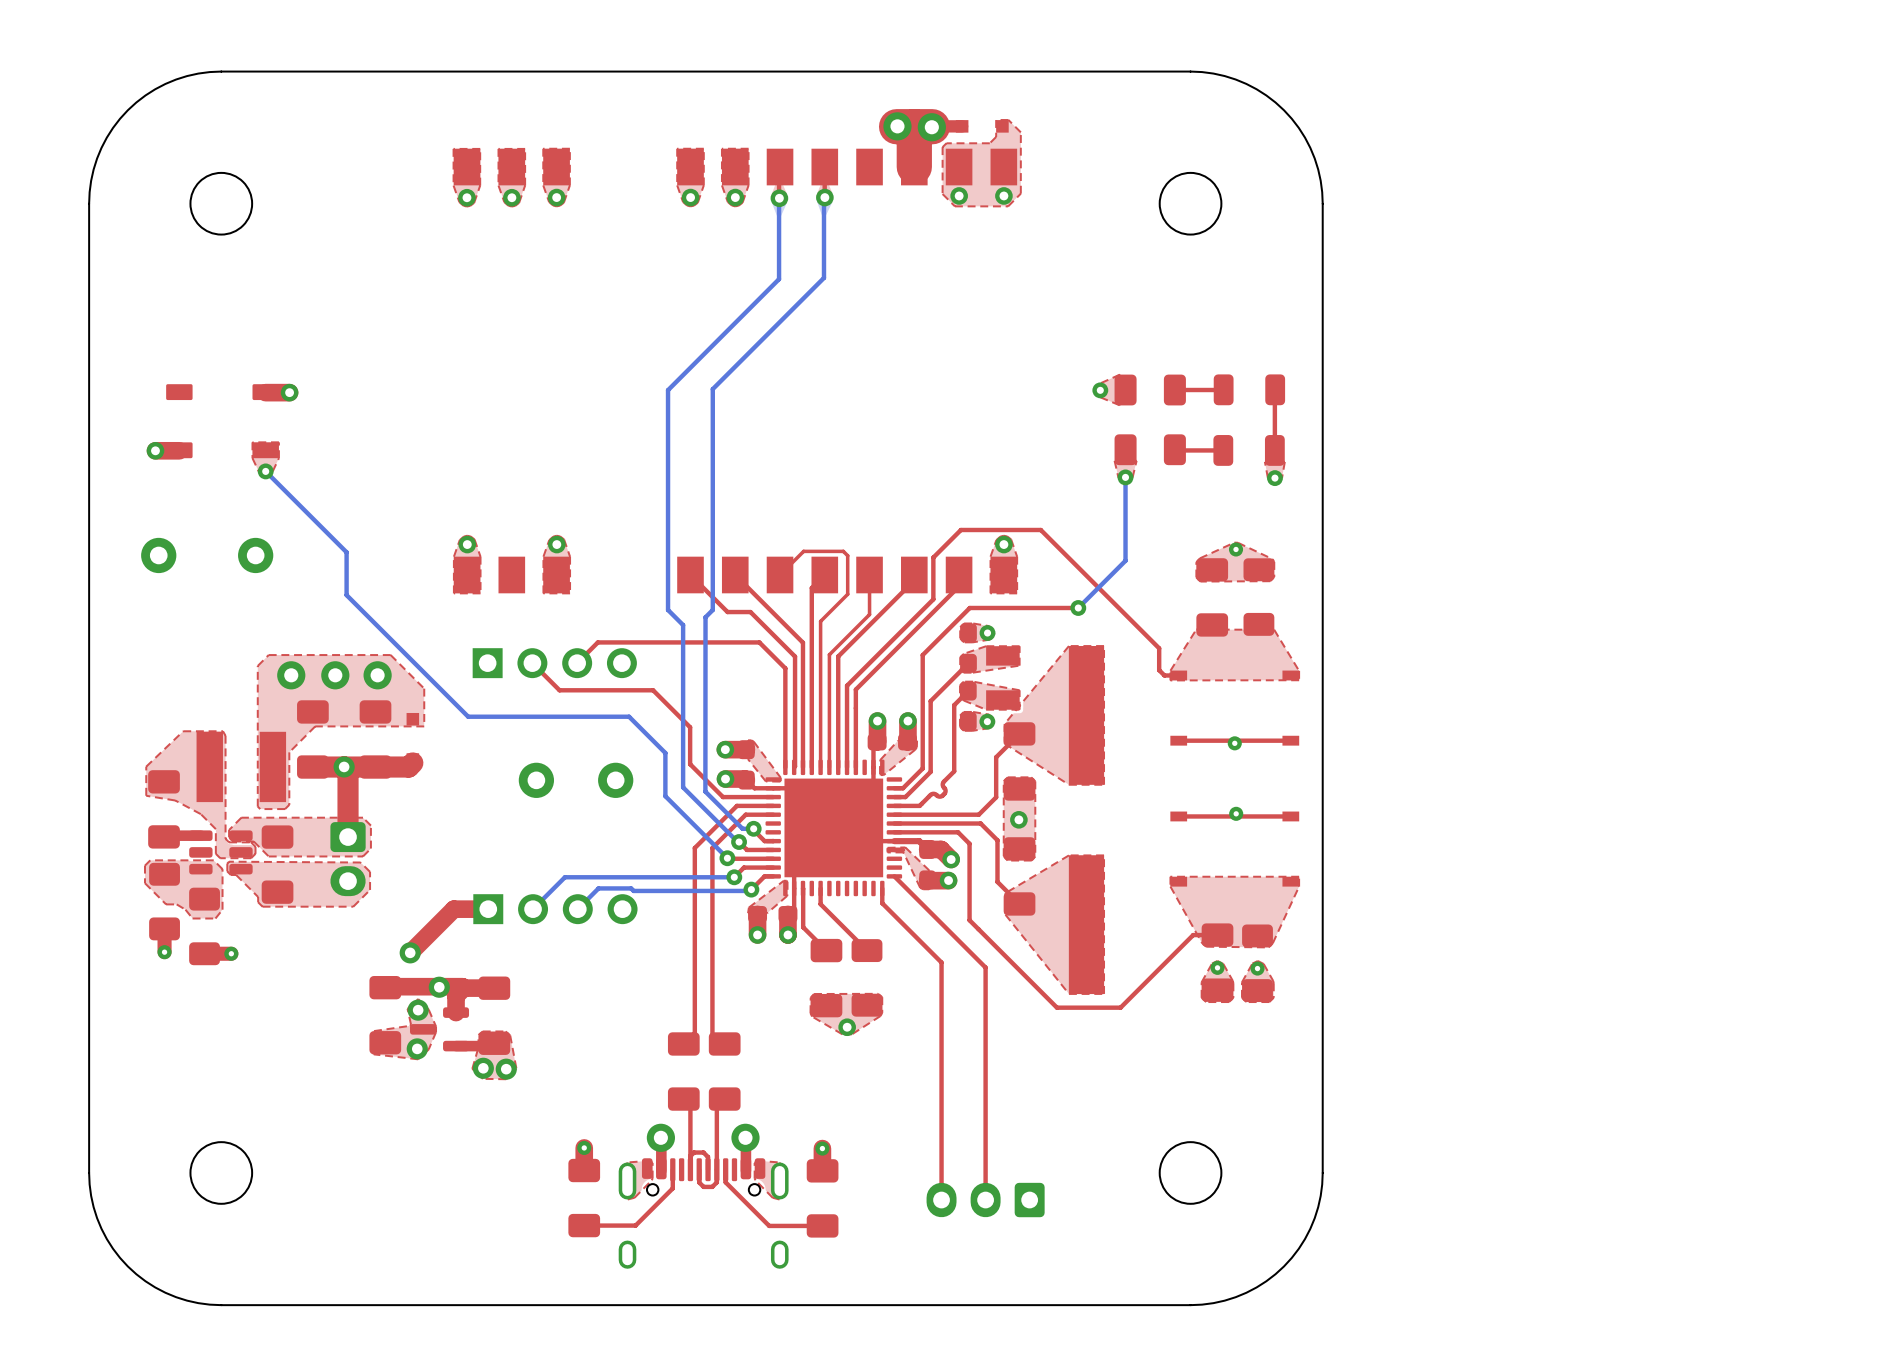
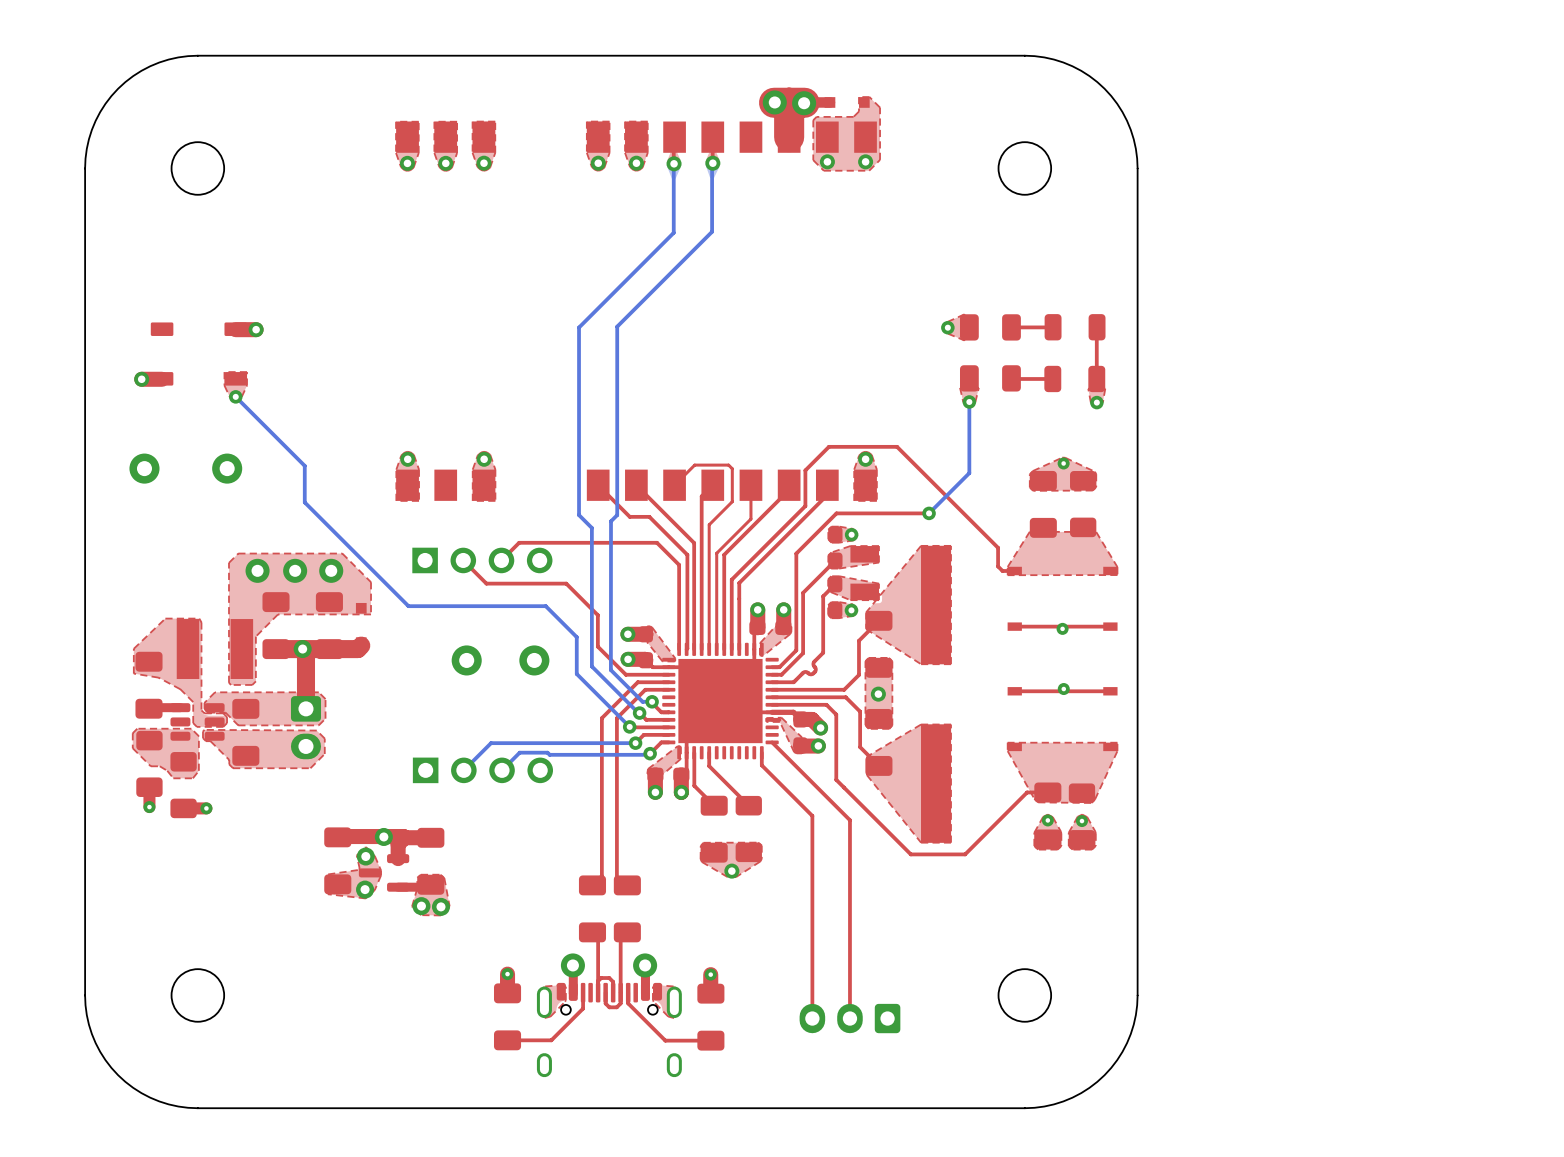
top track: (488, 909) (453, 909) (410, 952) -> none
via: (410, 952) -> none

